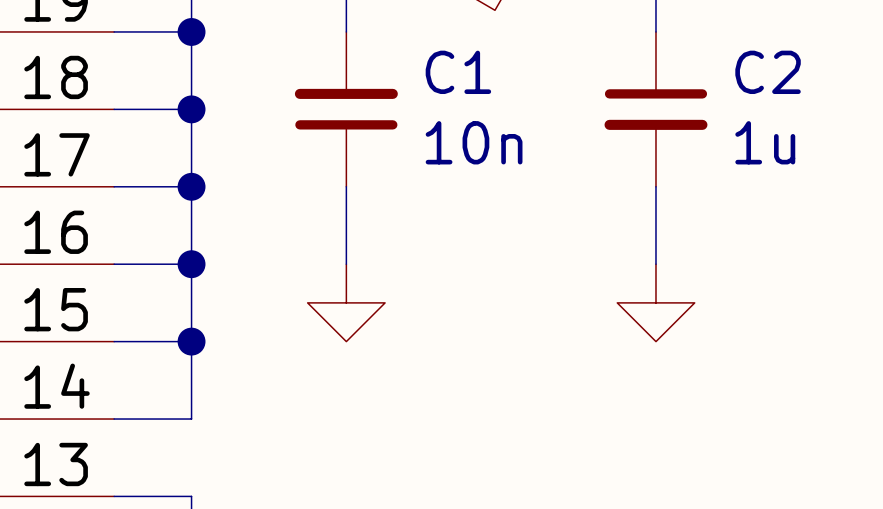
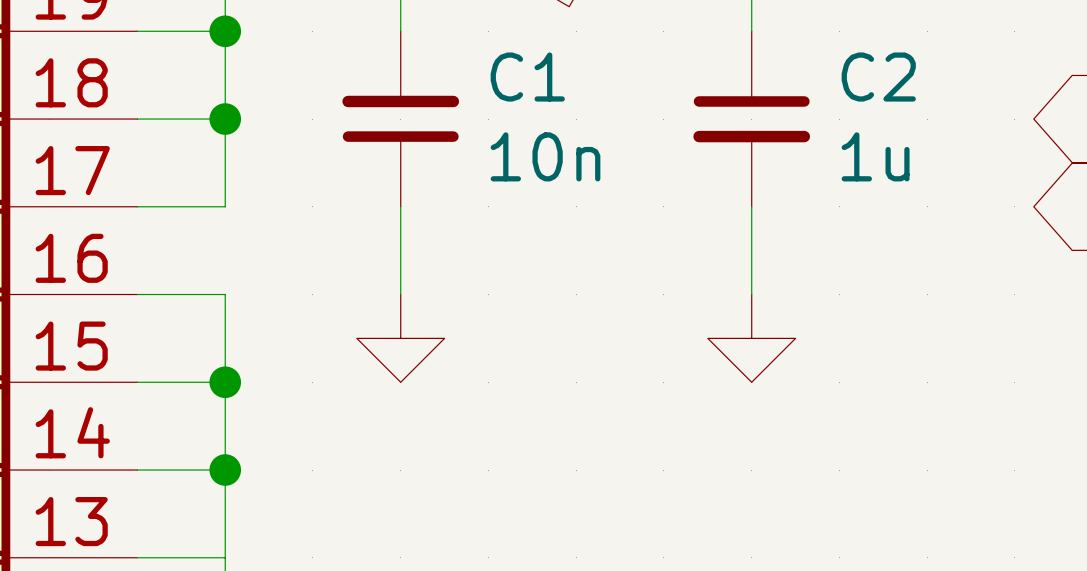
wire: (191, 186) (191, 264) -> (225, 470) (225, 557)
junction: (191, 186) -> none
junction: (191, 264) -> none
junction: none -> (225, 470)

